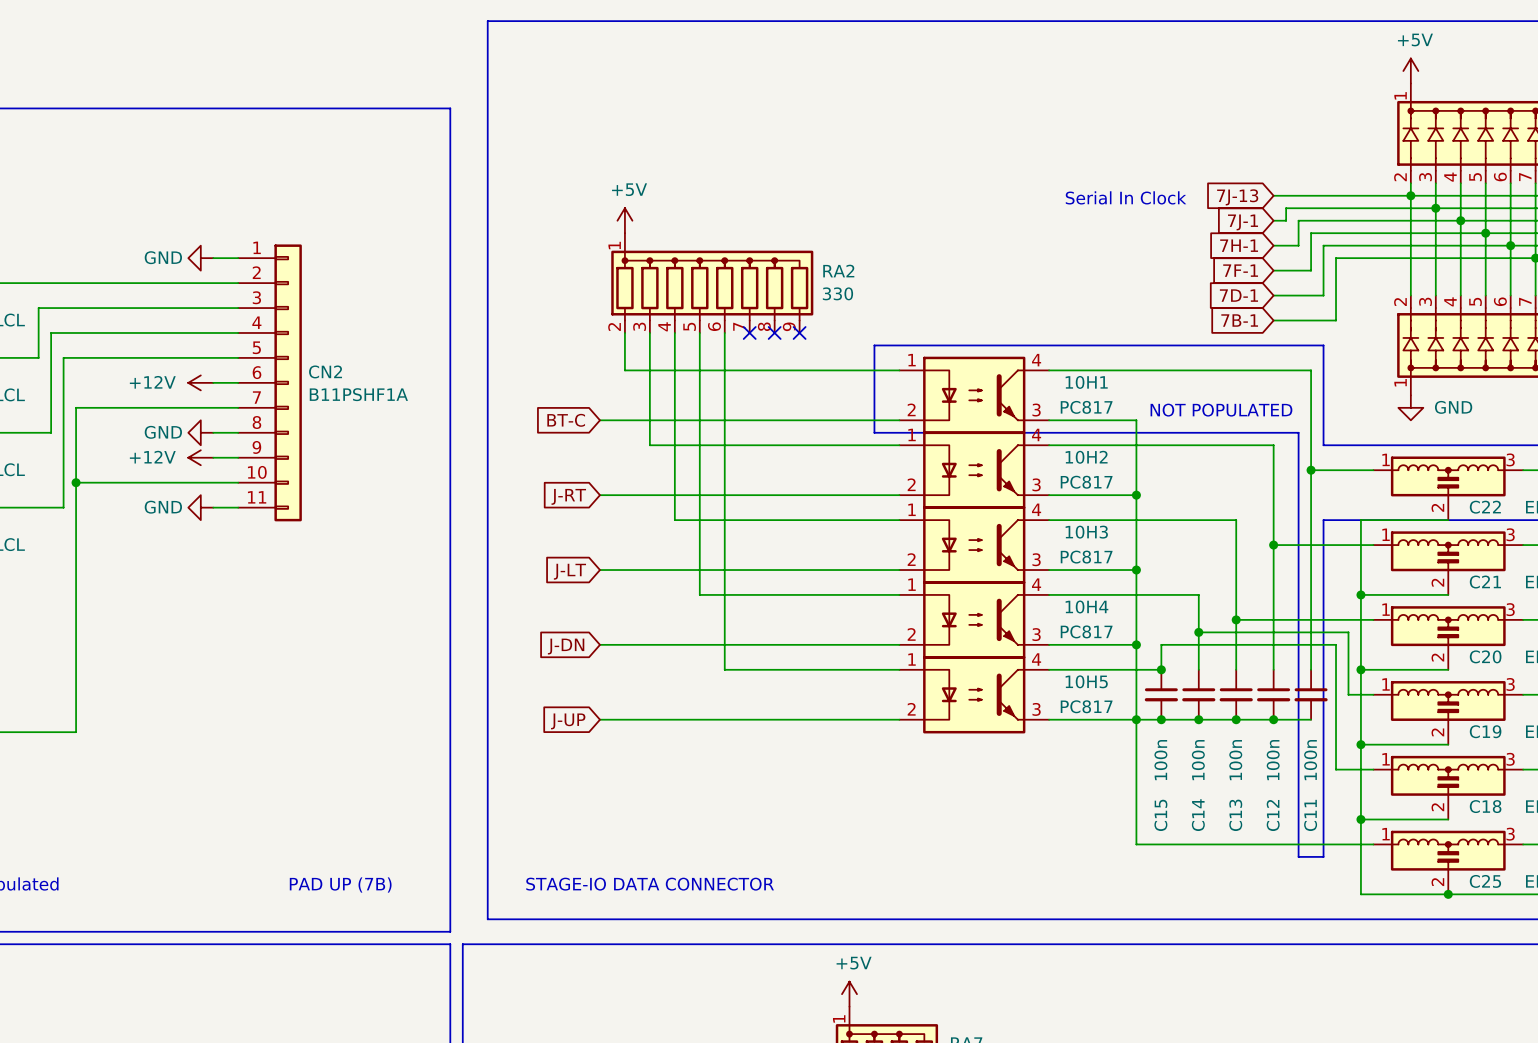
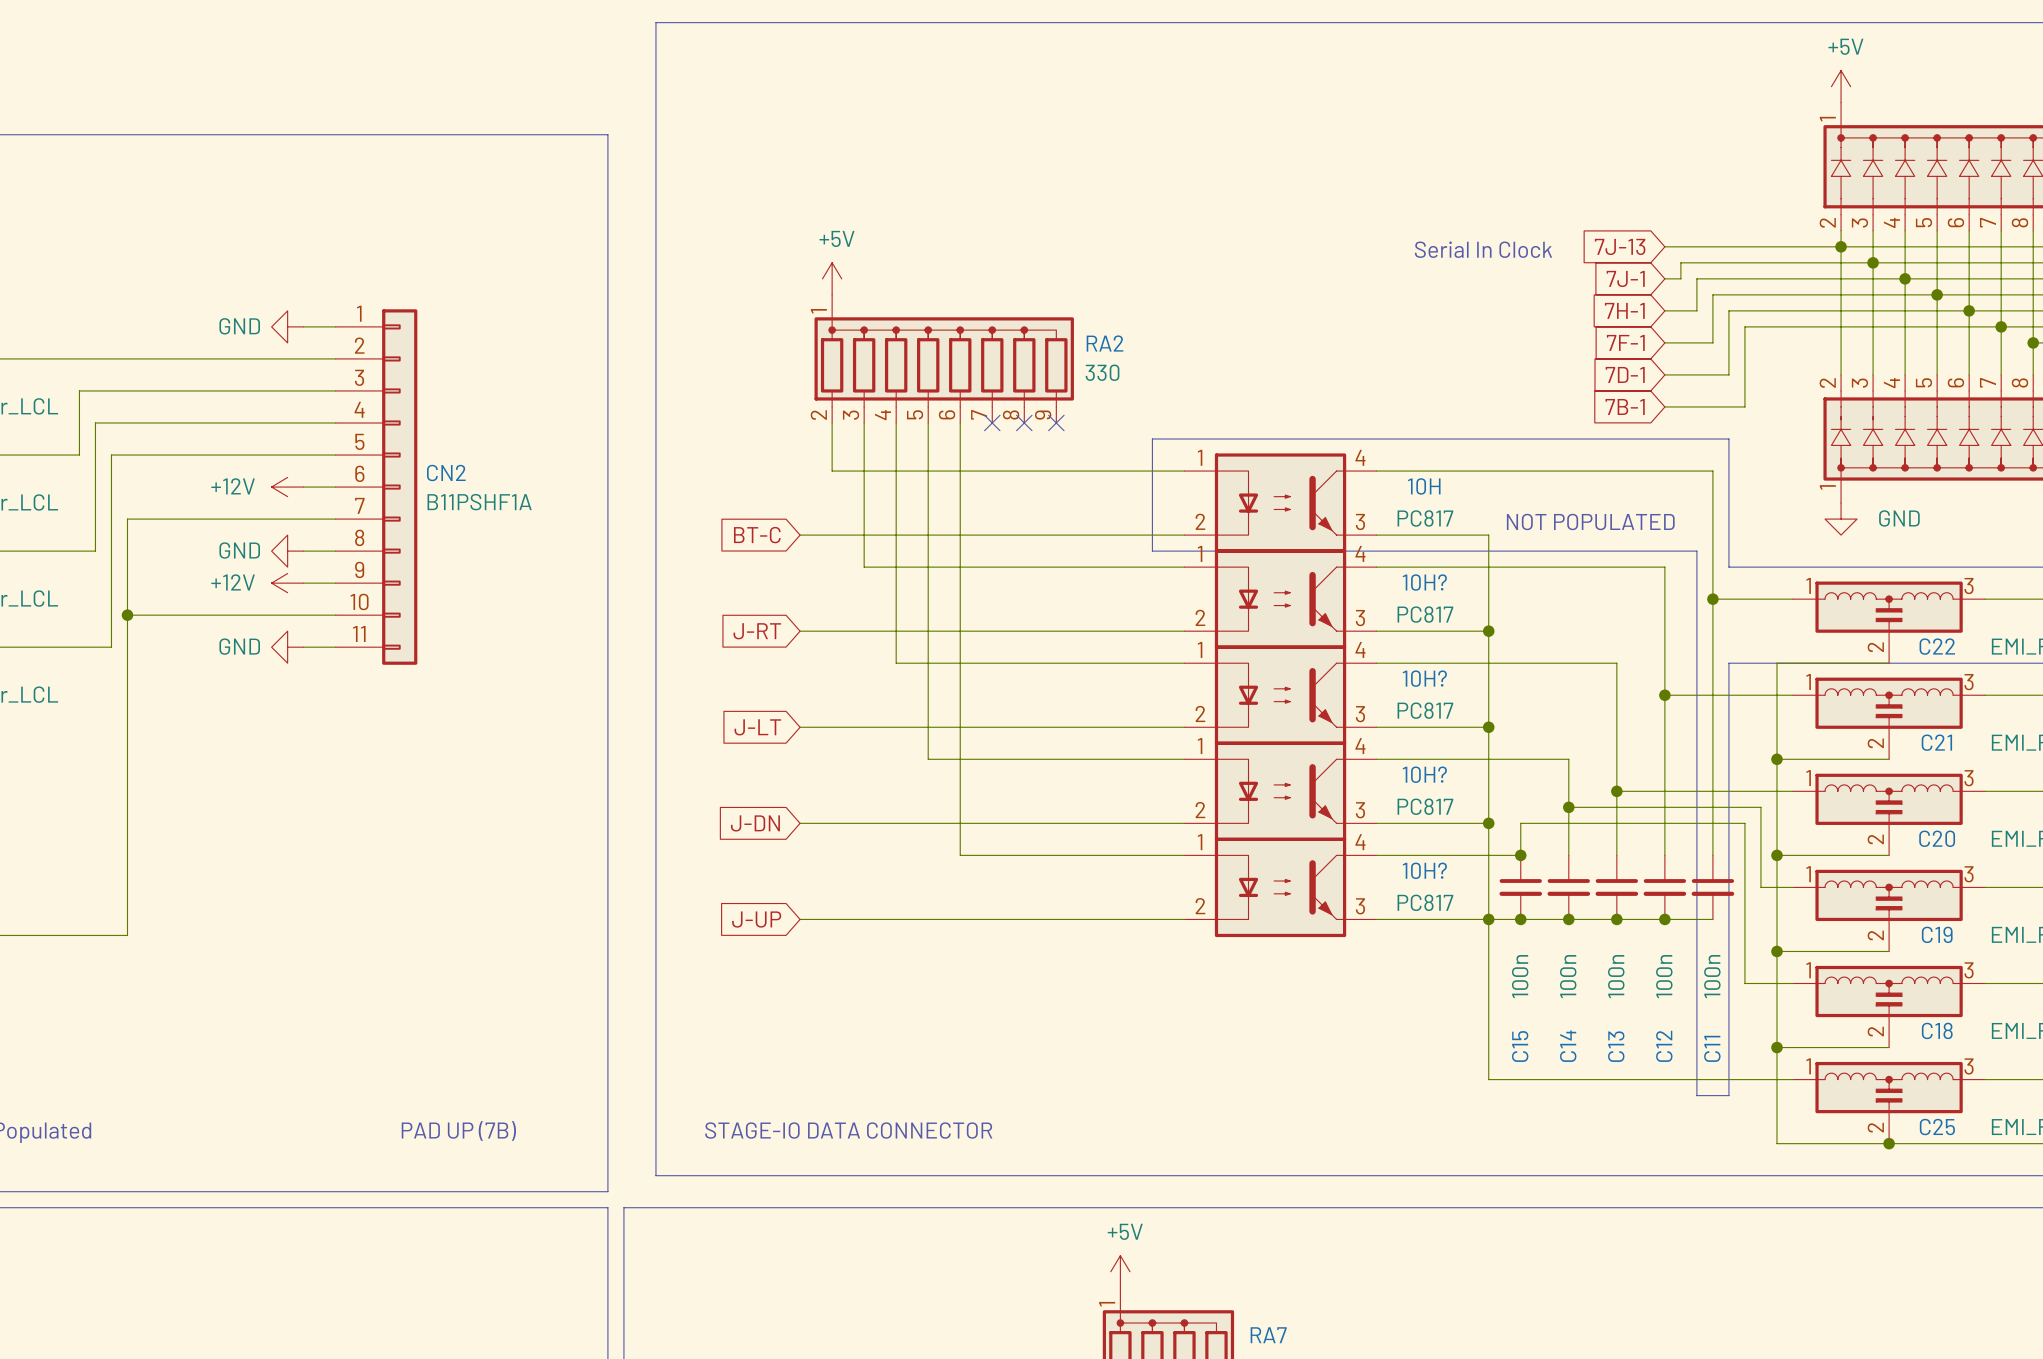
10H1 name: 10H1 (1086, 382) -> 10H (1424, 486)
10H2 name: 10H2 (1086, 457) -> 10H? (1424, 582)
10H3 name: 10H3 (1086, 532) -> 10H? (1424, 678)
10H4 name: 10H4 (1086, 606) -> 10H? (1424, 774)
10H5 name: 10H5 (1086, 681) -> 10H? (1424, 870)

